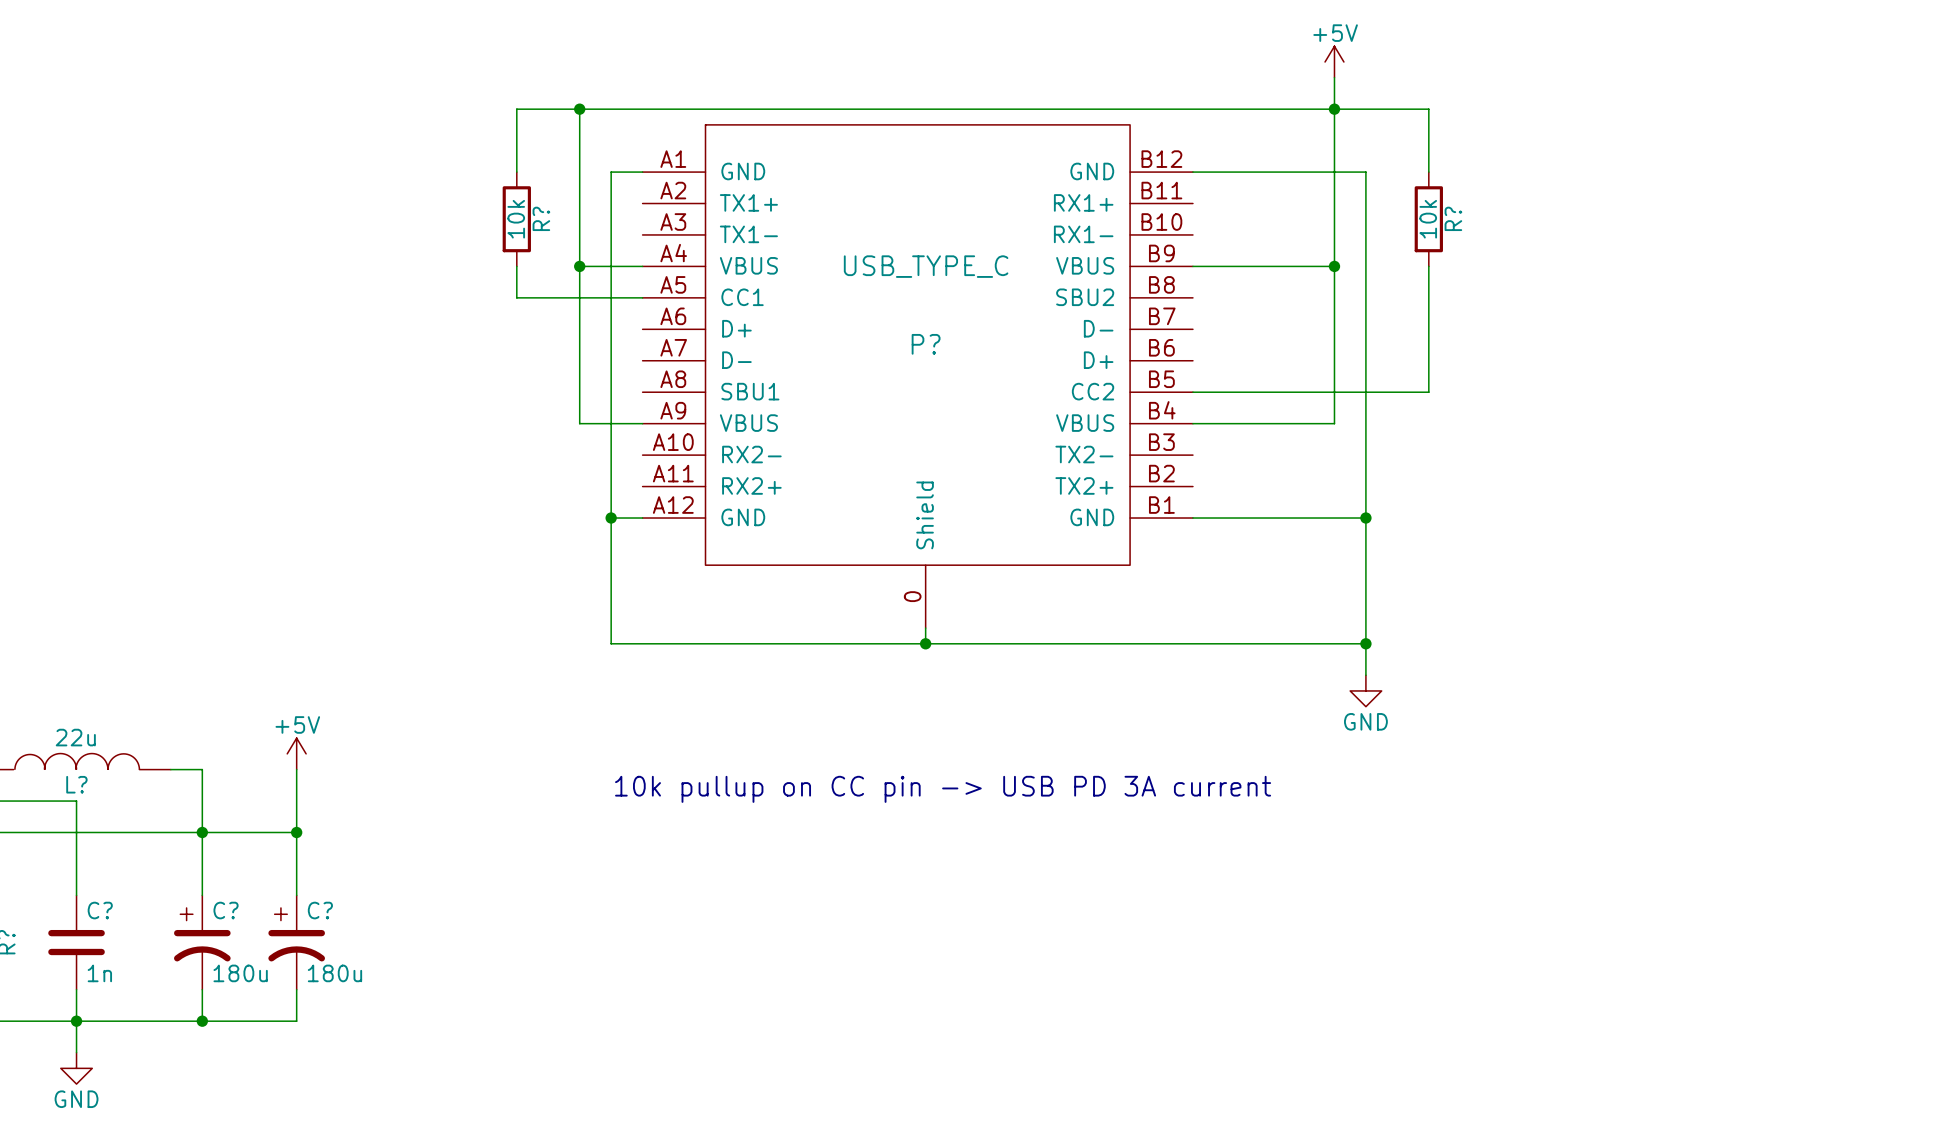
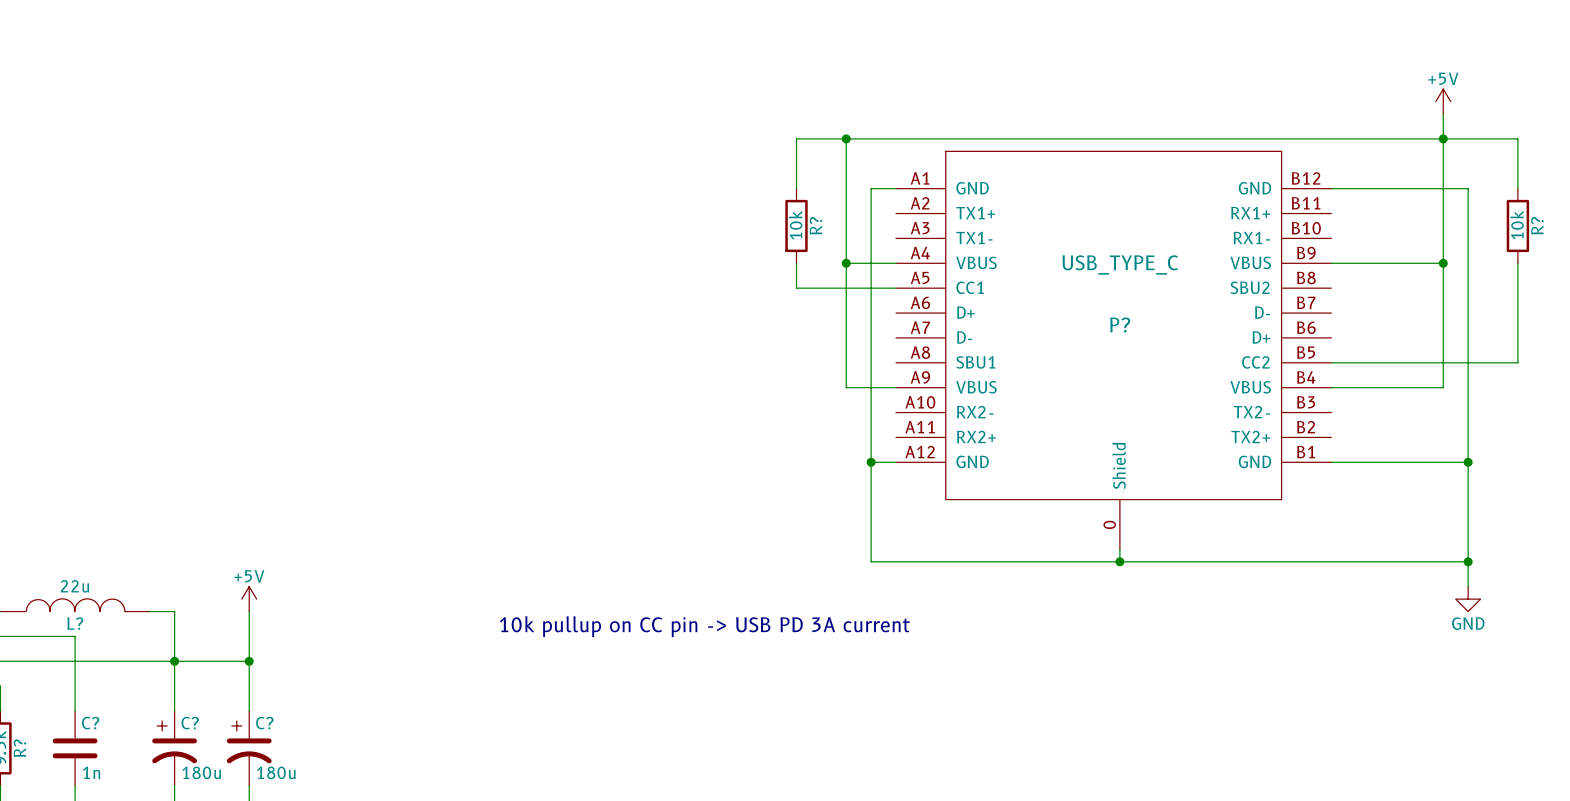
power symbol: +5V (1334, 62) -> none
wire: (1334, 77) (1334, 423) (1192, 423) -> none
wire: (579, 109) (579, 423) (642, 423) -> none
junction: (579, 109) -> none
junction: (1334, 109) -> none
power symbol: none -> +5V (1443, 101)
wire: none -> (1443, 114) (1443, 387) (1331, 387)
wire: (516, 172) (516, 109) (1428, 109) (1428, 172) -> none
wire: (642, 172) (611, 172) (611, 643) (1365, 643) -> none
wire: none -> (846, 138) (846, 387) (896, 387)
junction: none -> (846, 138)
wire: none -> (958, 138) (796, 138) (796, 188)
wire: (1365, 172) (1365, 675) -> (1095, 138) (1517, 138) (1517, 188)
junction: none -> (1443, 138)
R?: 10k (516, 219) -> none
R?: 10k (1428, 219) -> none
wire: none -> (896, 188) (871, 188) (871, 561) (1468, 561)
wire: none -> (1331, 188) (1468, 188) (1468, 586)
wire: (516, 266) (516, 297) (642, 297) -> none
wire: (579, 266) (642, 266) -> none
junction: (579, 266) -> none
wire: (1192, 266) (1334, 266) -> none
junction: (1334, 266) -> none
wire: (1428, 266) (1428, 392) (1192, 392) -> none
R?: none -> 10k (796, 225)
R?: none -> 10k (1517, 225)
wire: none -> (796, 263) (796, 288) (896, 288)
wire: none -> (846, 263) (896, 263)
junction: none -> (846, 263)
wire: none -> (1331, 263) (1443, 263)
junction: none -> (1443, 263)
wire: none -> (1517, 263) (1517, 362) (1331, 362)
P?: USB_TYPE_C (917, 376) -> none
P?: none -> USB_TYPE_C (1113, 350)
wire: (611, 518) (642, 518) -> none
junction: (611, 518) -> none
wire: (1192, 518) (1365, 518) -> none
junction: (1365, 518) -> none
wire: none -> (871, 462) (896, 462)
junction: none -> (871, 462)
wire: none -> (1331, 462) (1468, 462)
junction: none -> (1468, 462)
wire: (925, 628) (925, 643) -> none
junction: (925, 643) -> none
junction position: (1365, 643) -> (1119, 561)
power symbol: GND (1365, 690) -> none
wire: none -> (1119, 549) (1119, 561)
junction: none -> (1468, 561)
power symbol: none -> GND (1468, 599)

